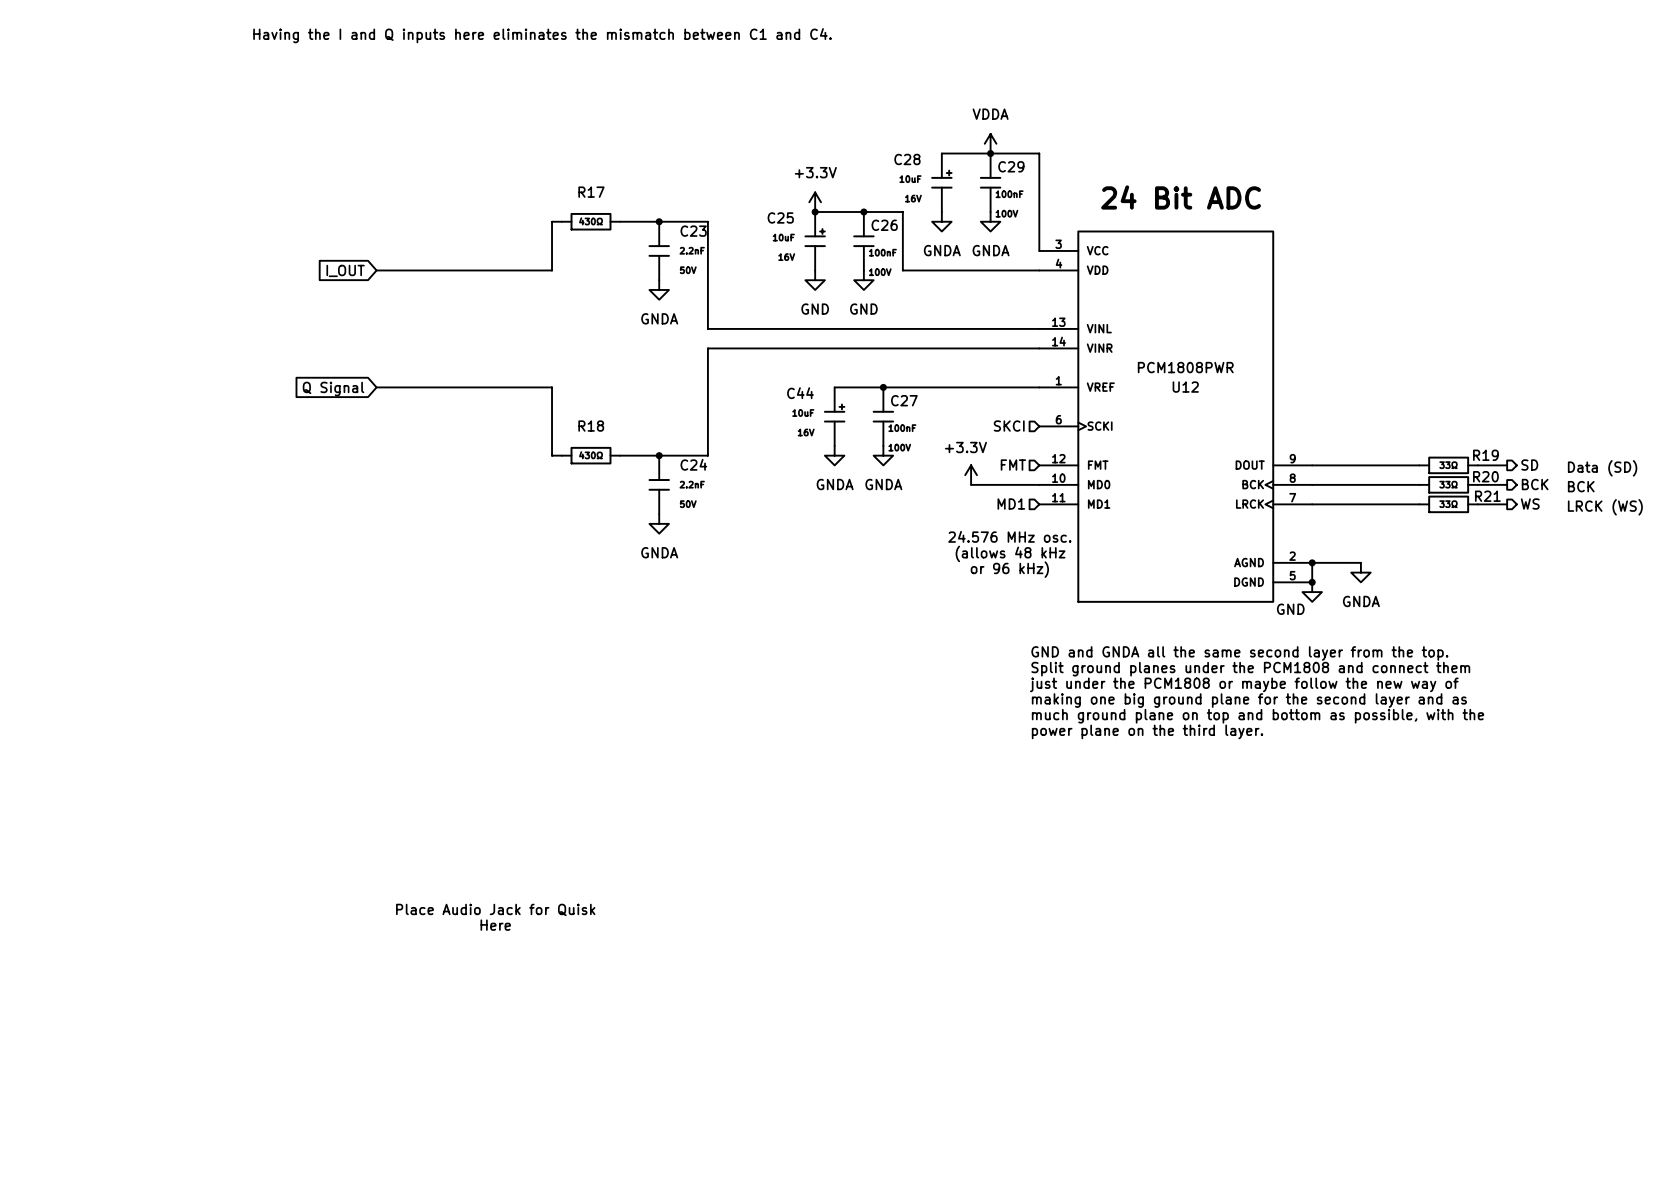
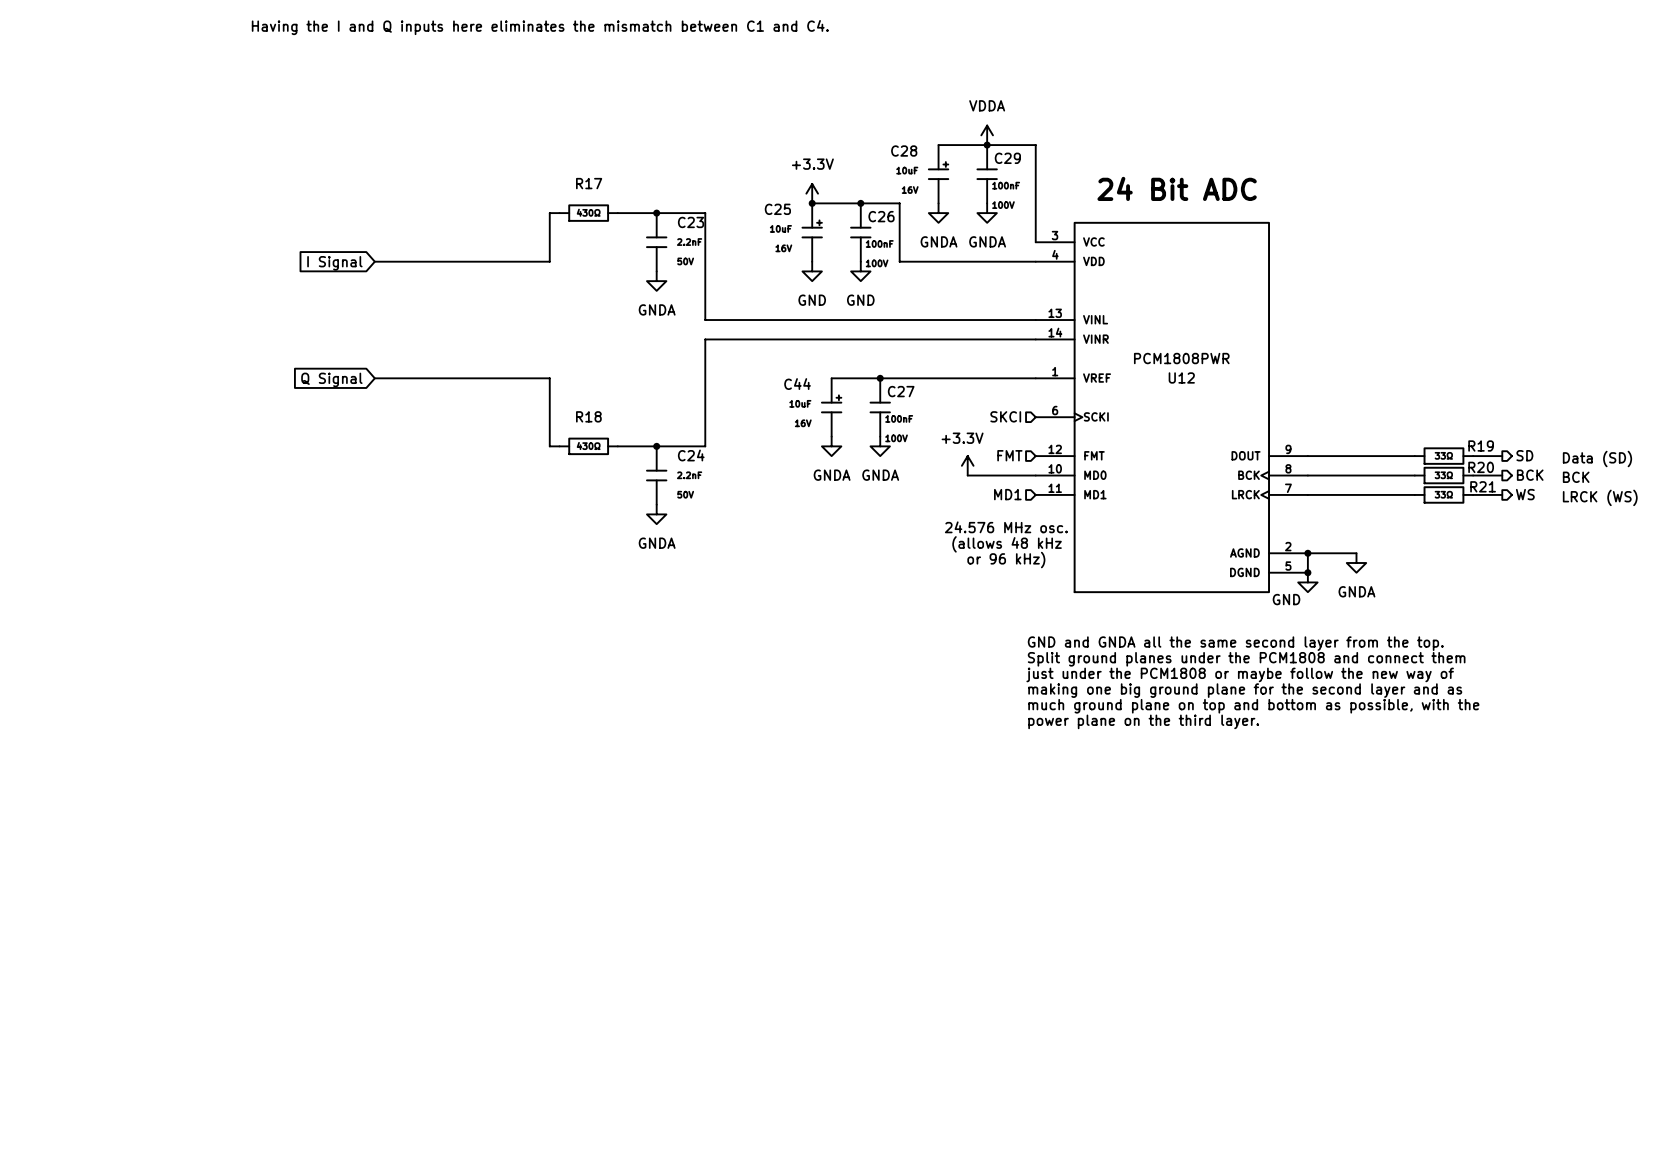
global label: I_OUT (345, 270) -> I Signal (334, 263)
text: Place Audio Jack for Quisk (495, 909) -> none
text: Here (495, 925) -> none

